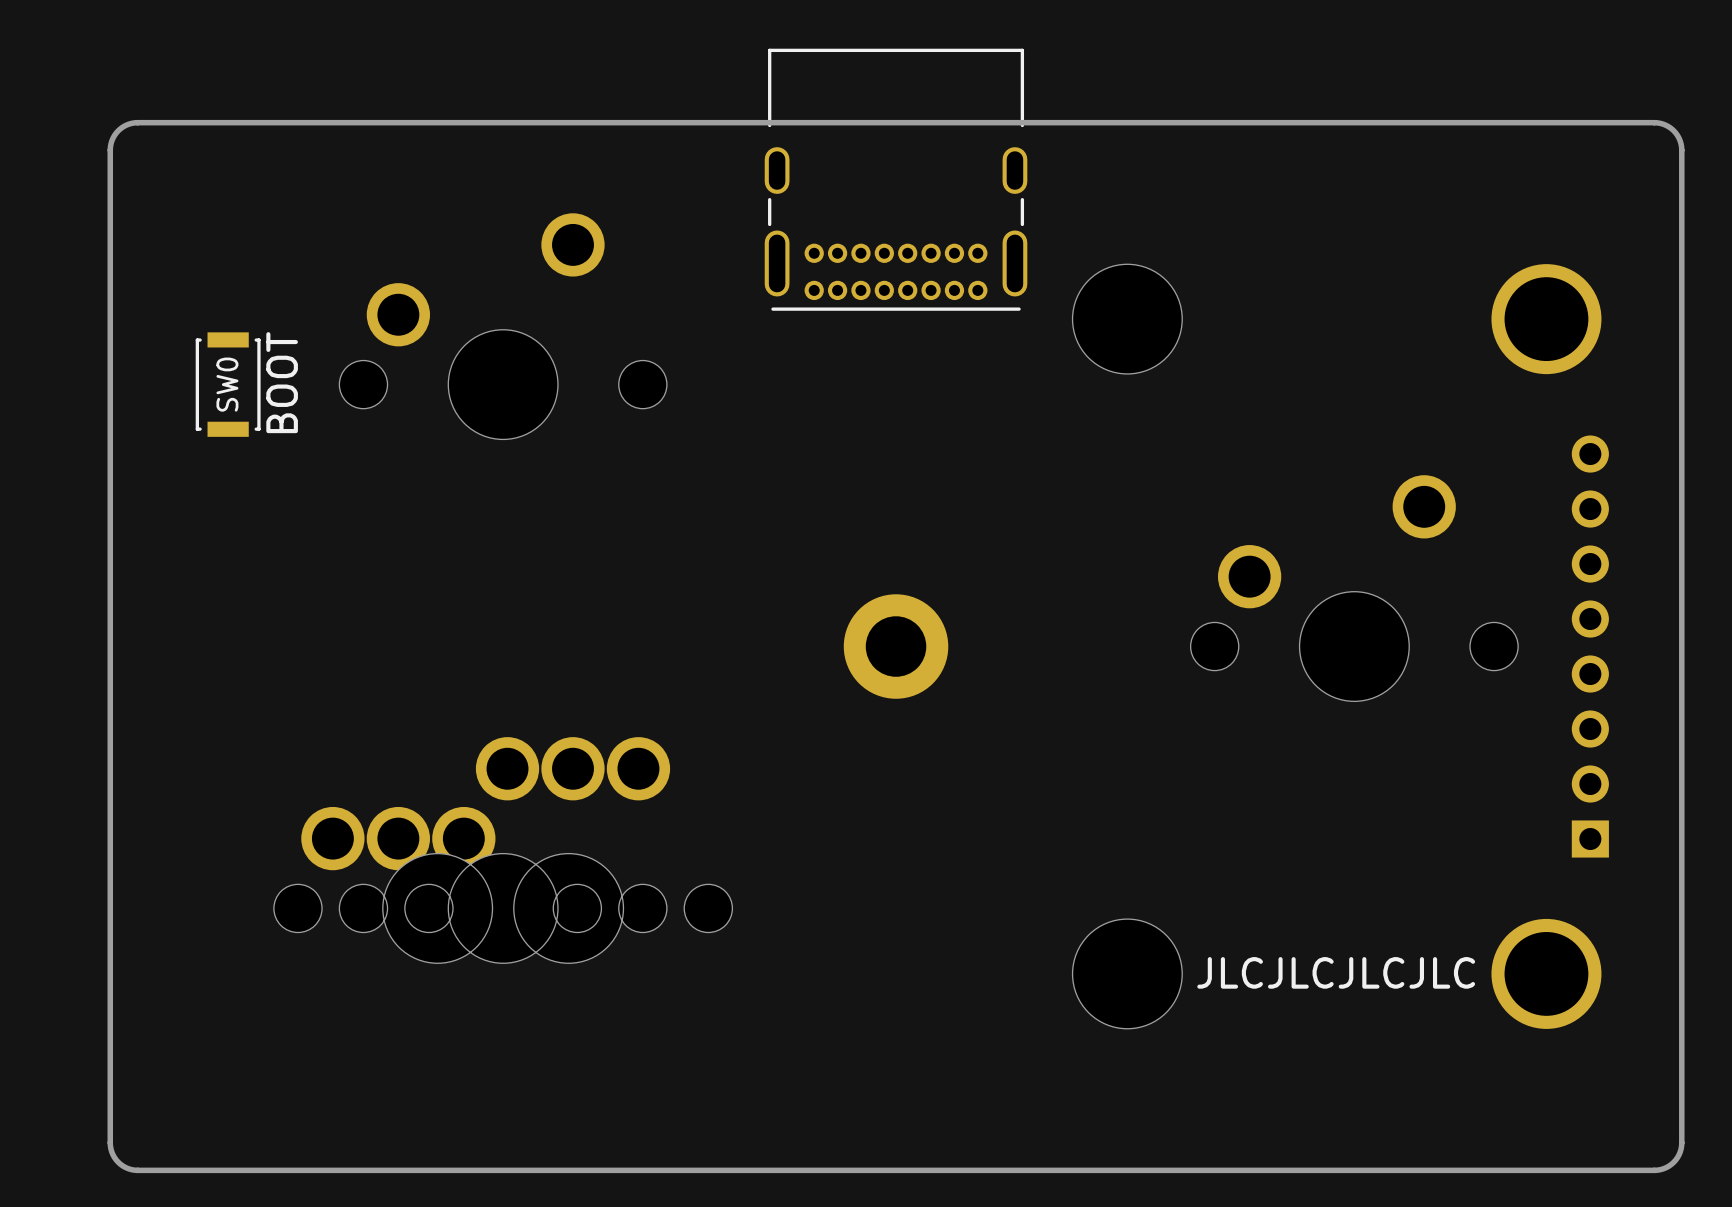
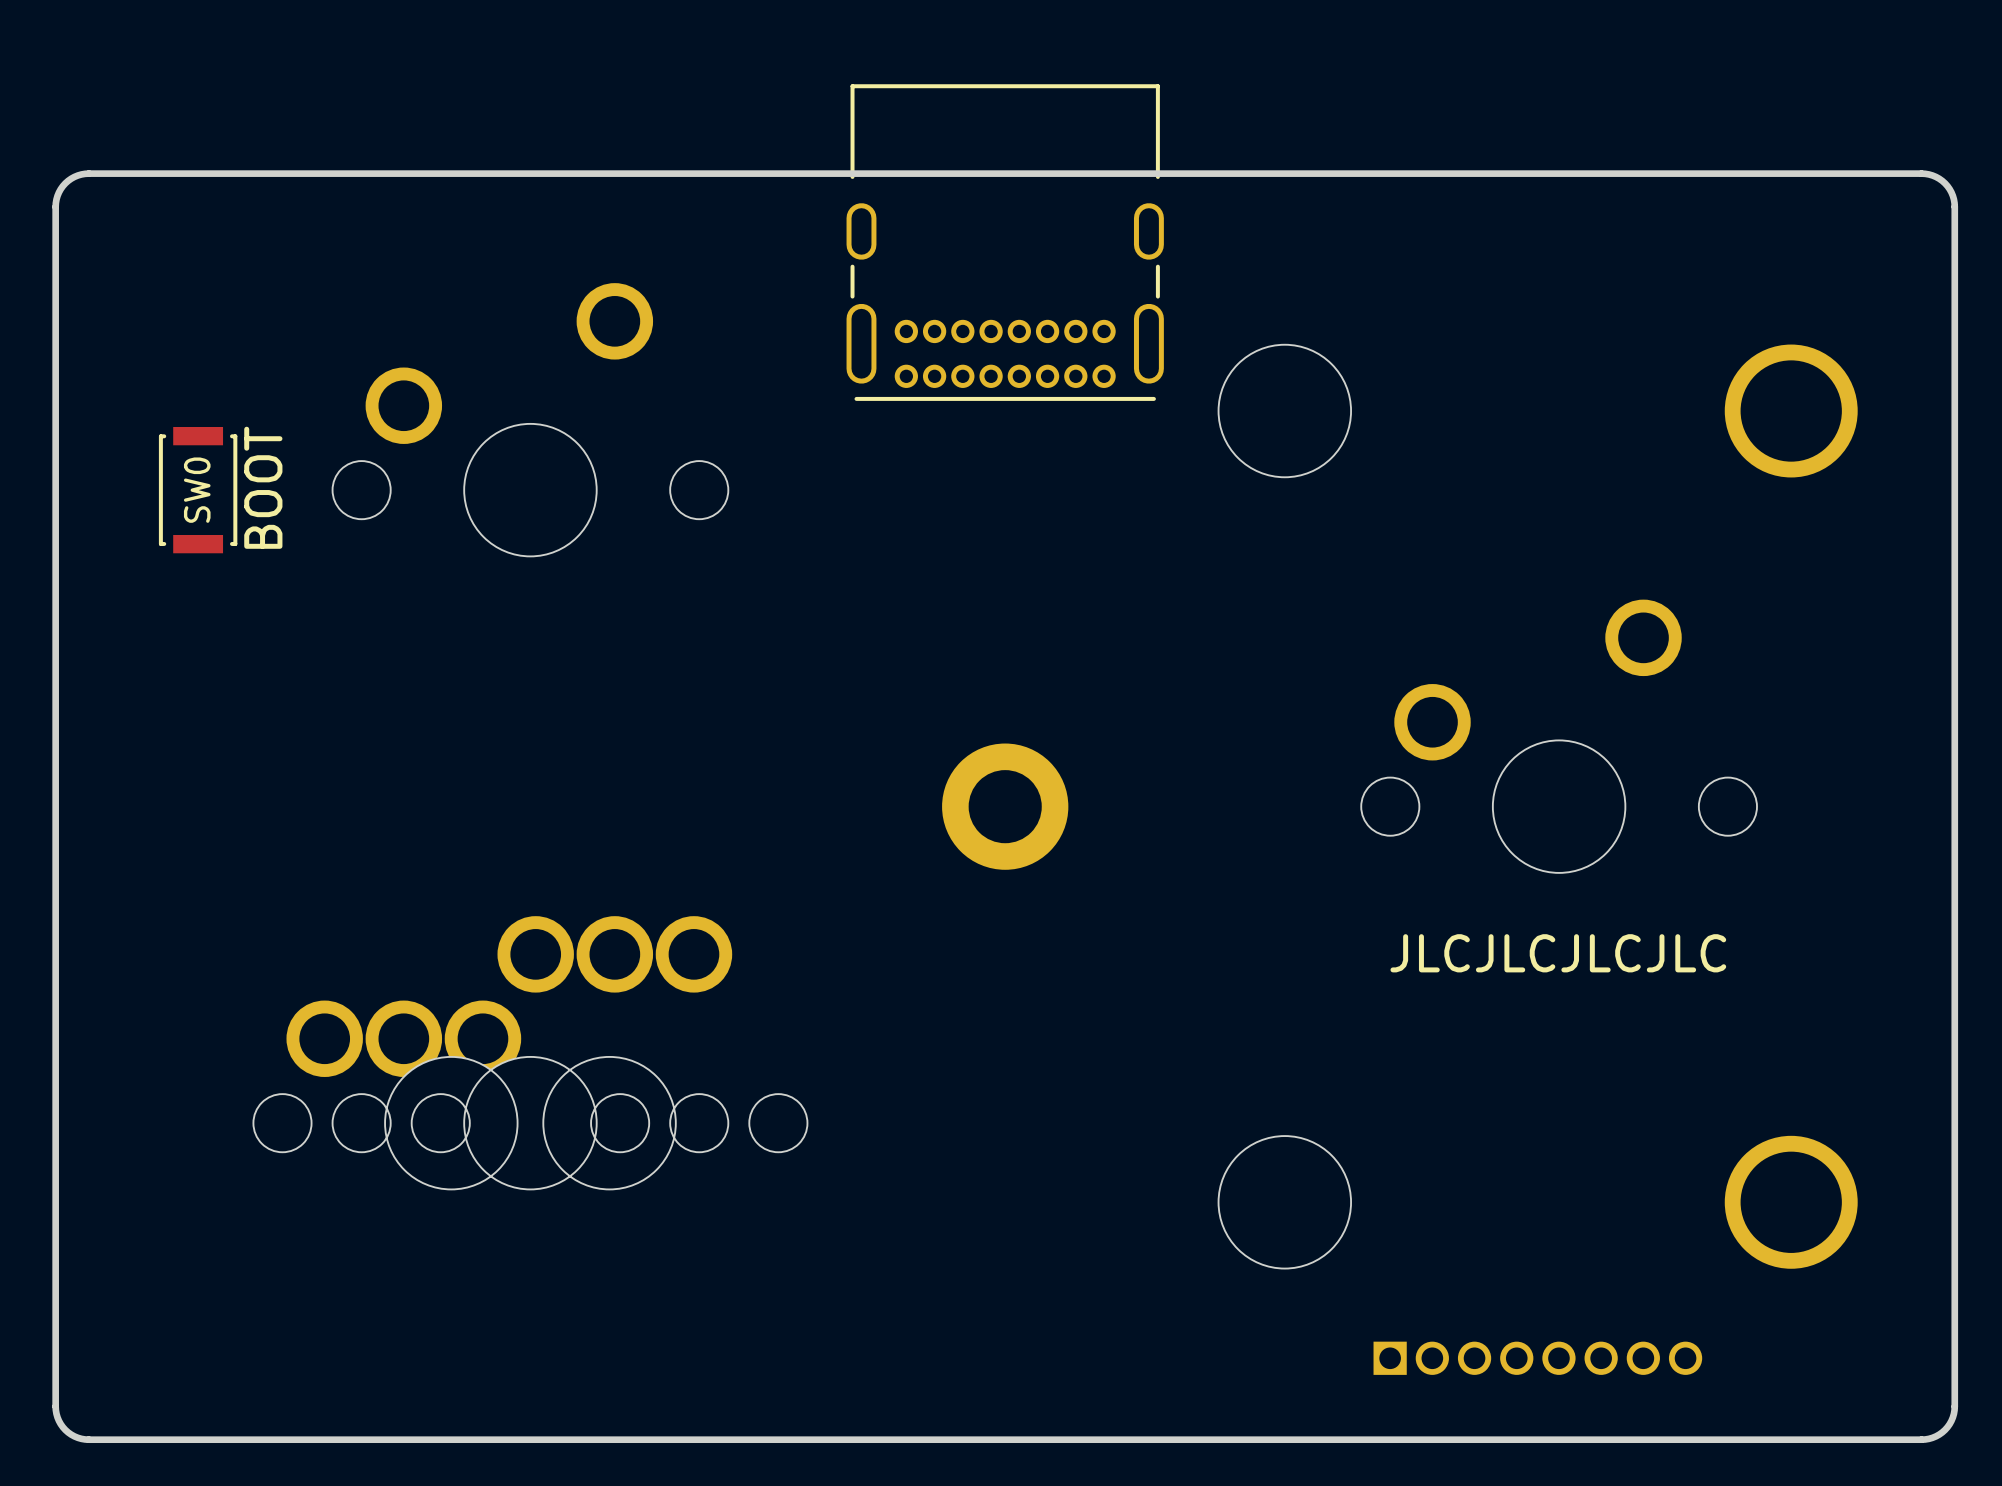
part: (1590, 646) -> none
text position: JLCJLCJLCJLC (1336, 972) -> JLCJLCJLCJLC (1558, 953)
part: none -> (1537, 1358)

